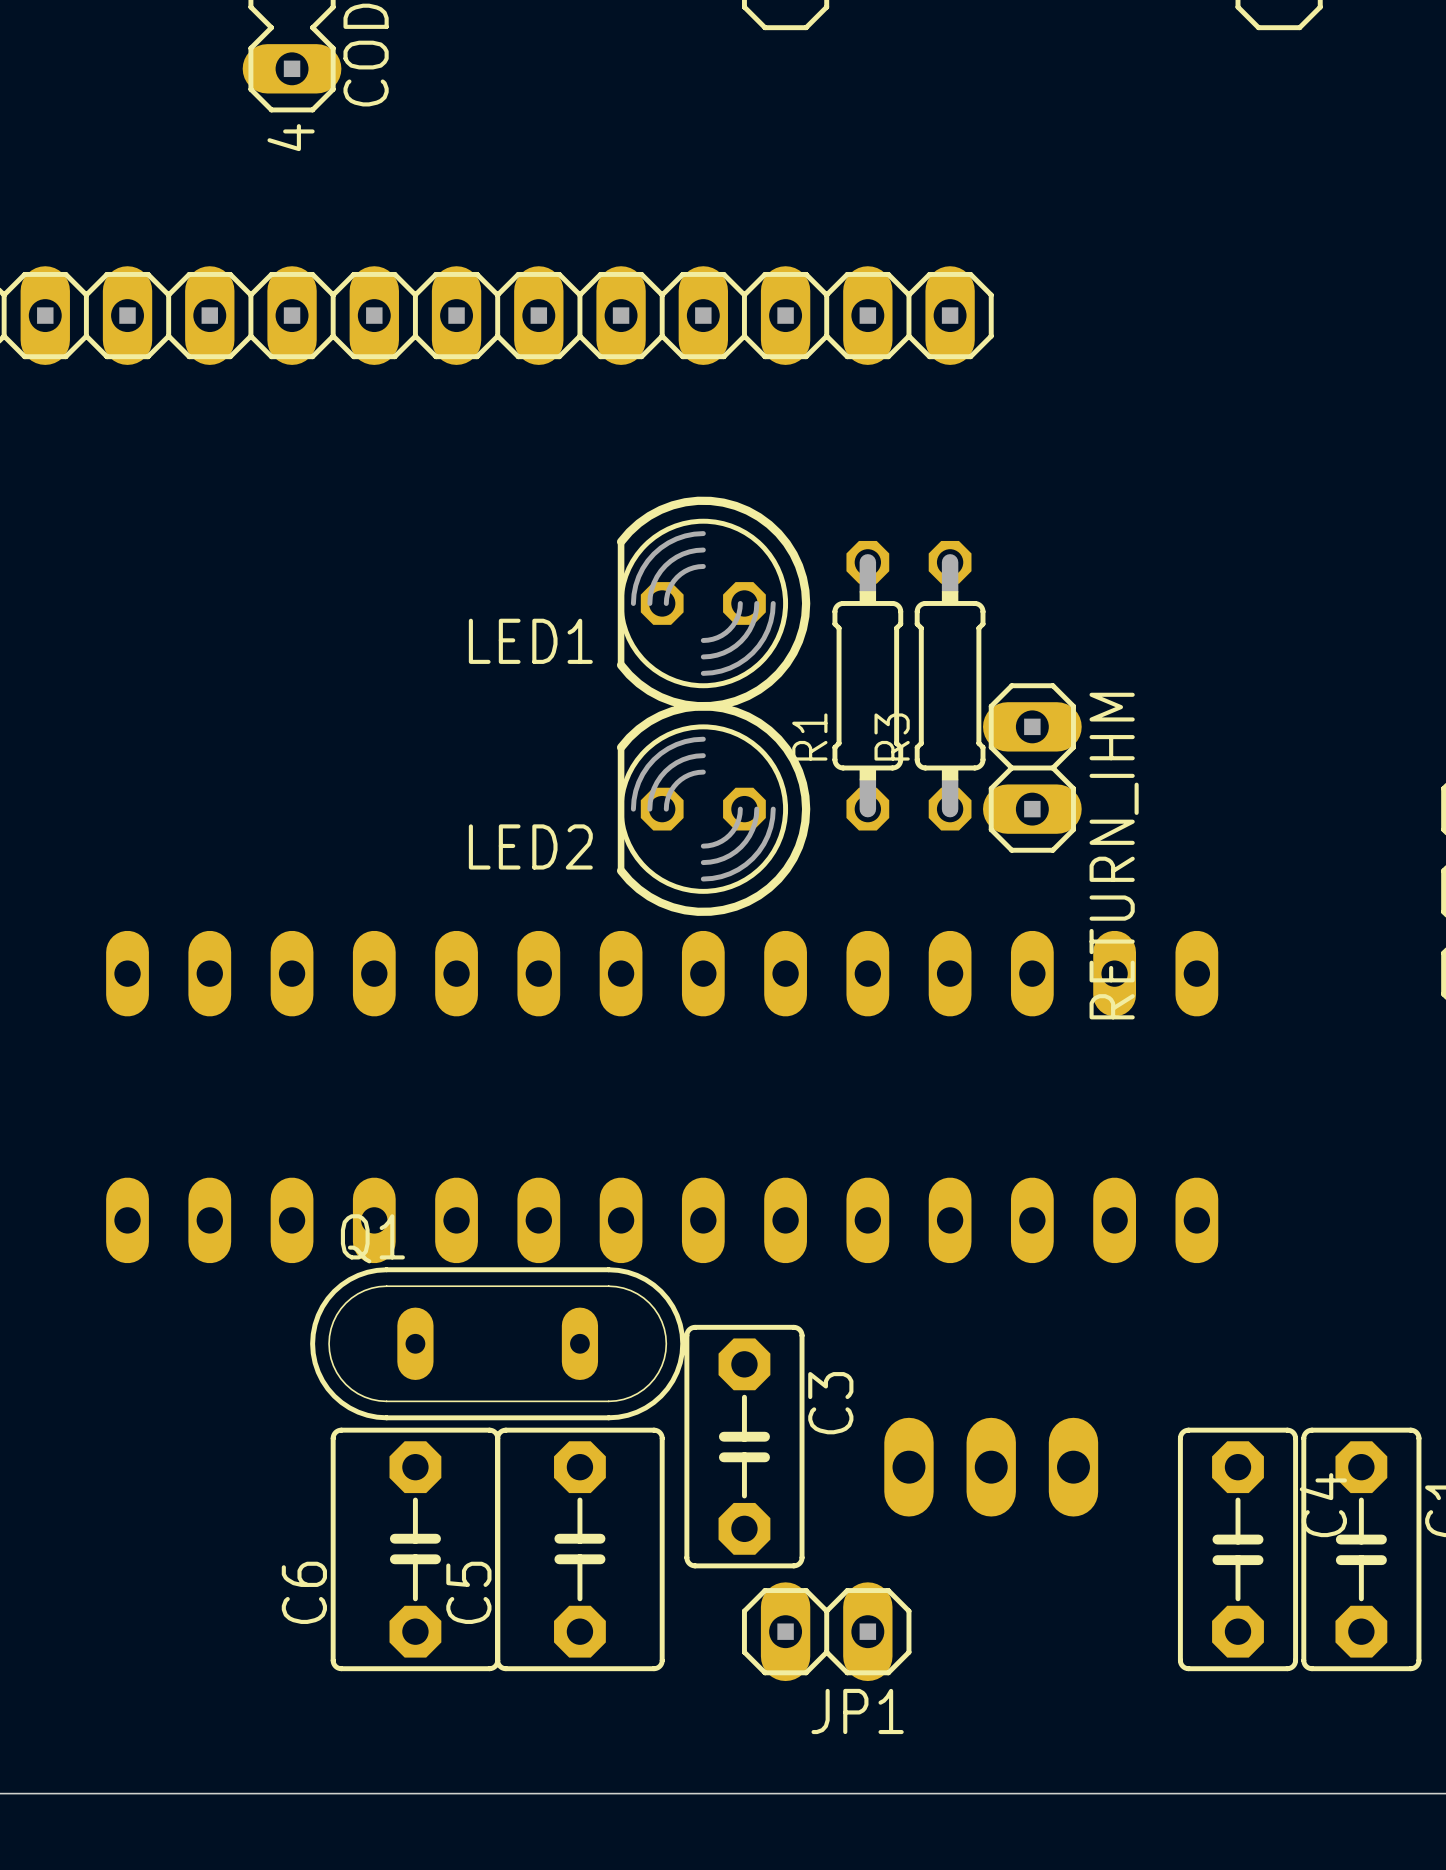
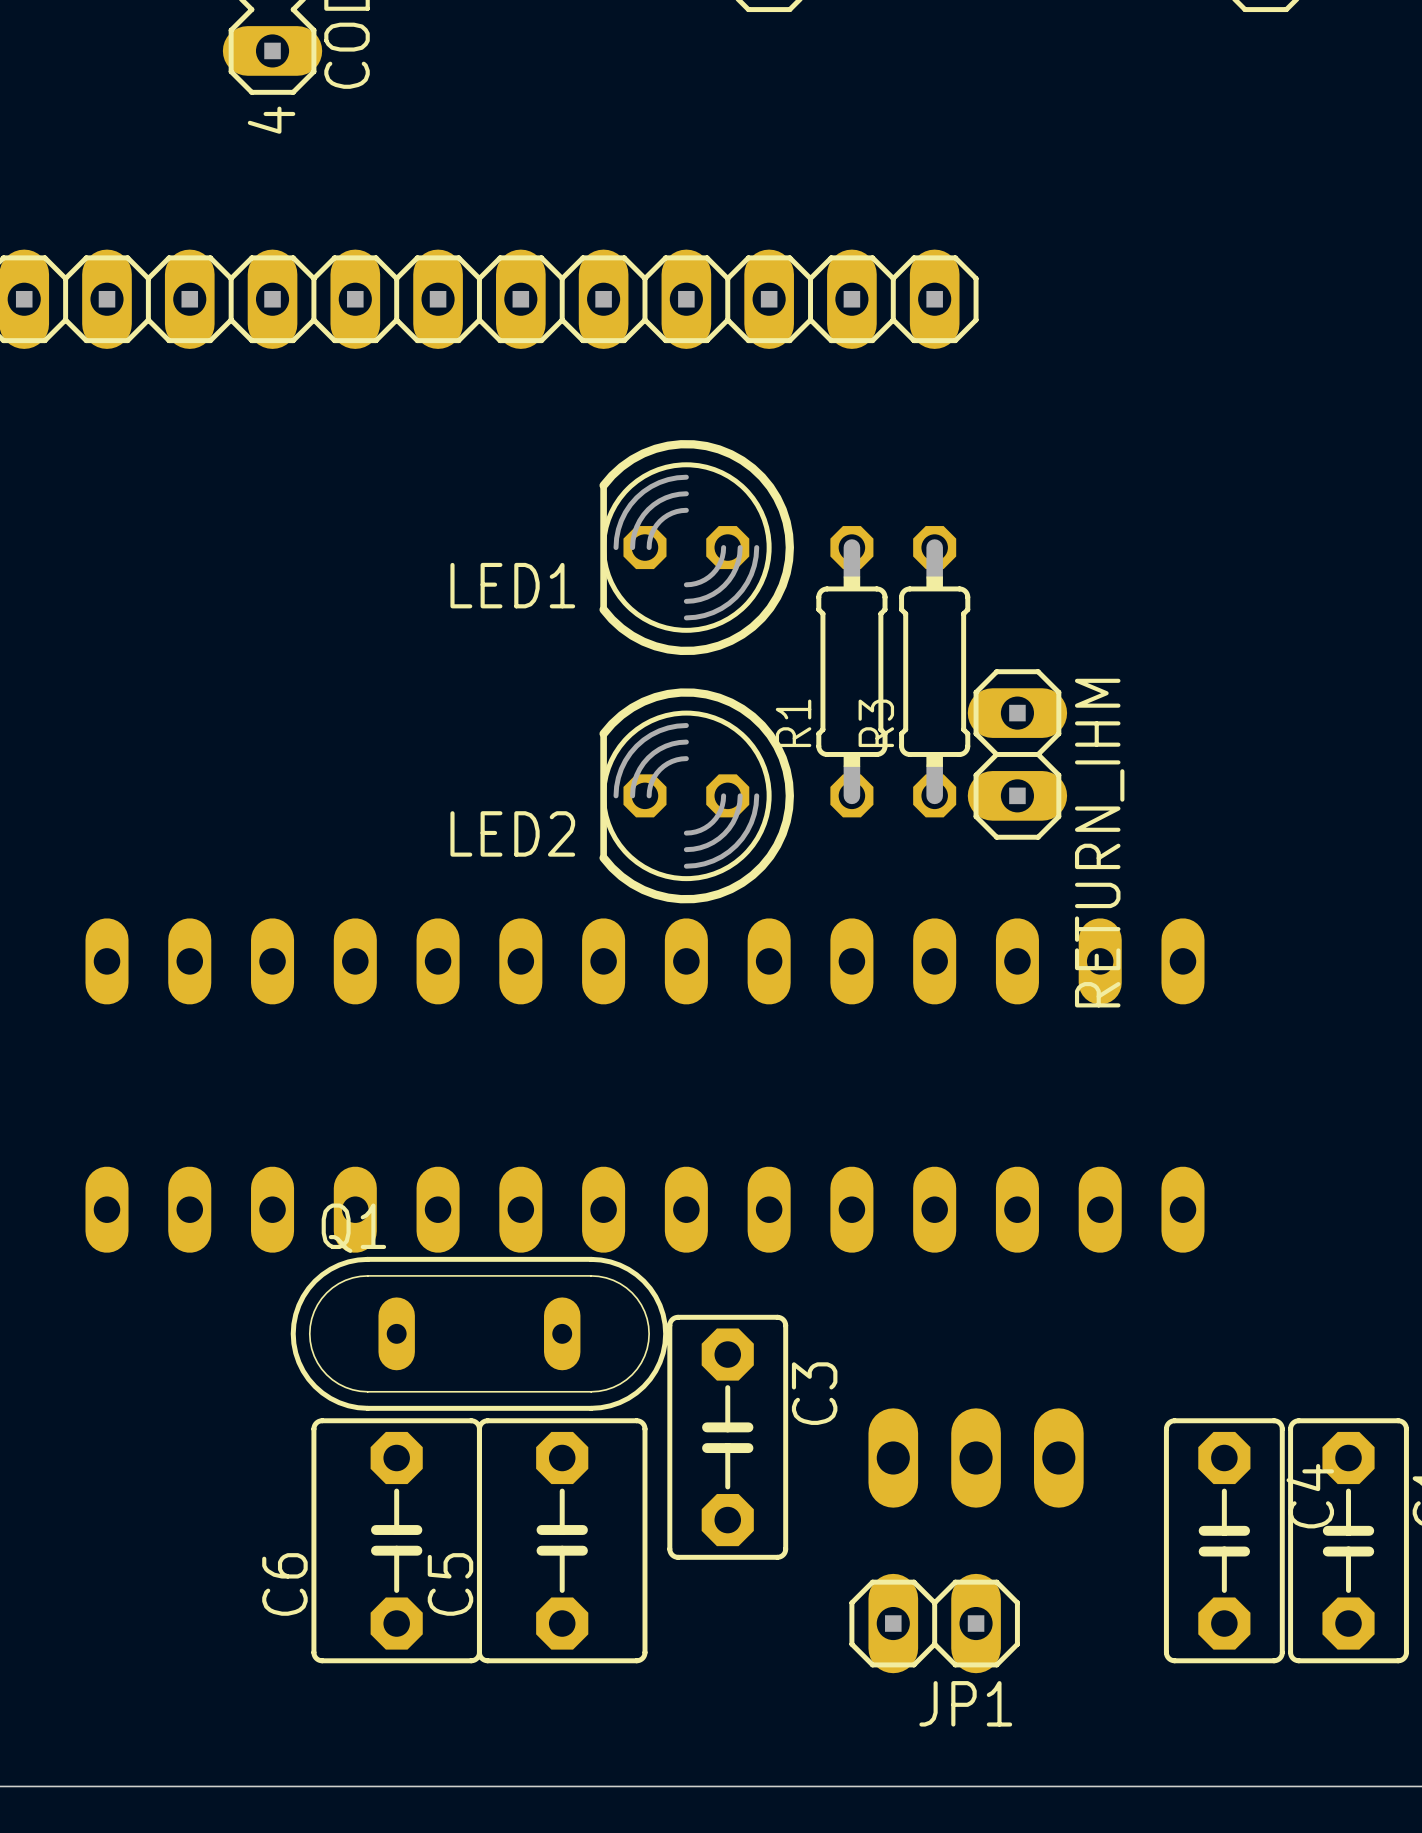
LED1 position: (713, 603) -> (696, 547)
JP1 position: (826, 1631) -> (934, 1623)

